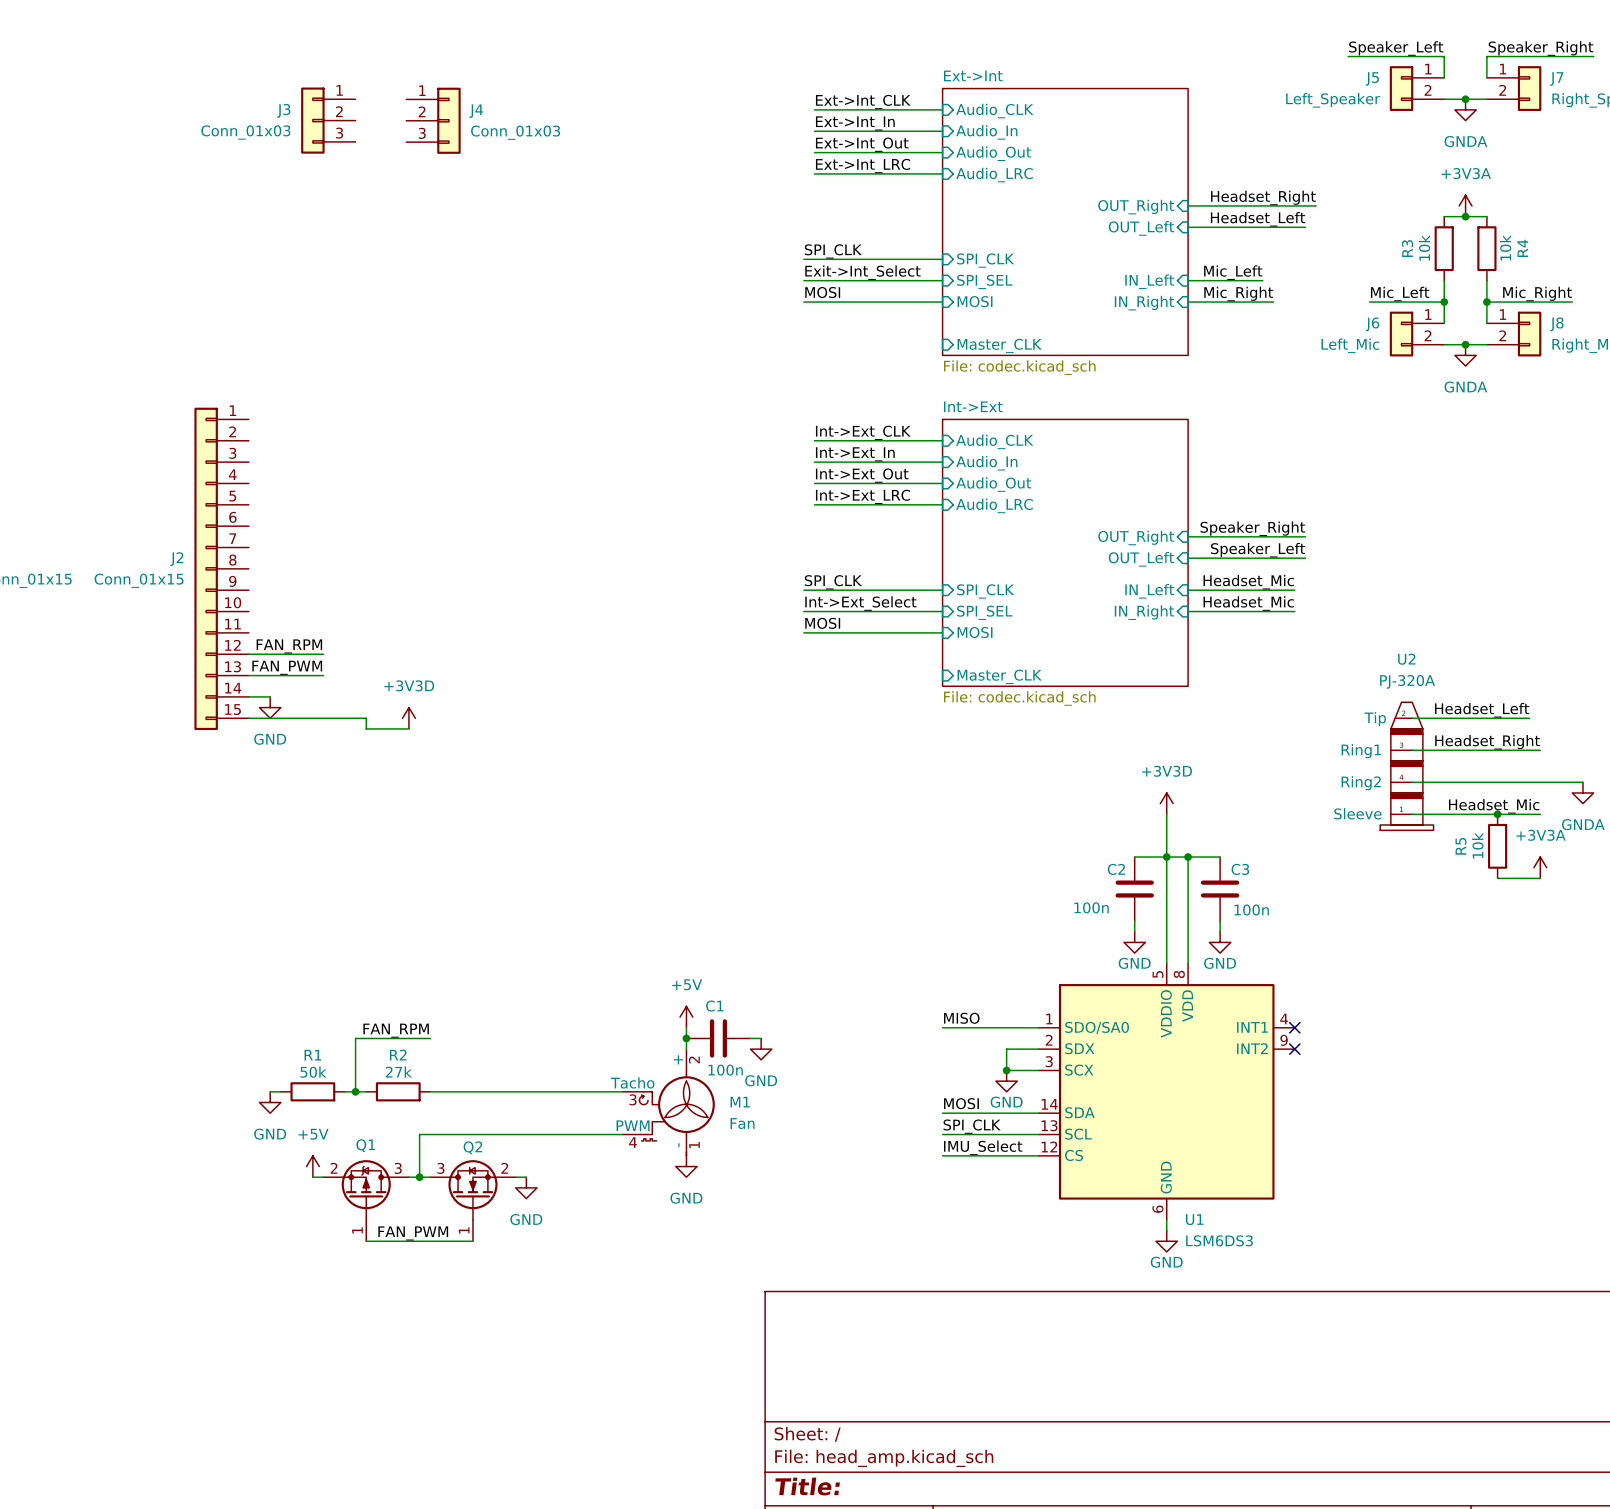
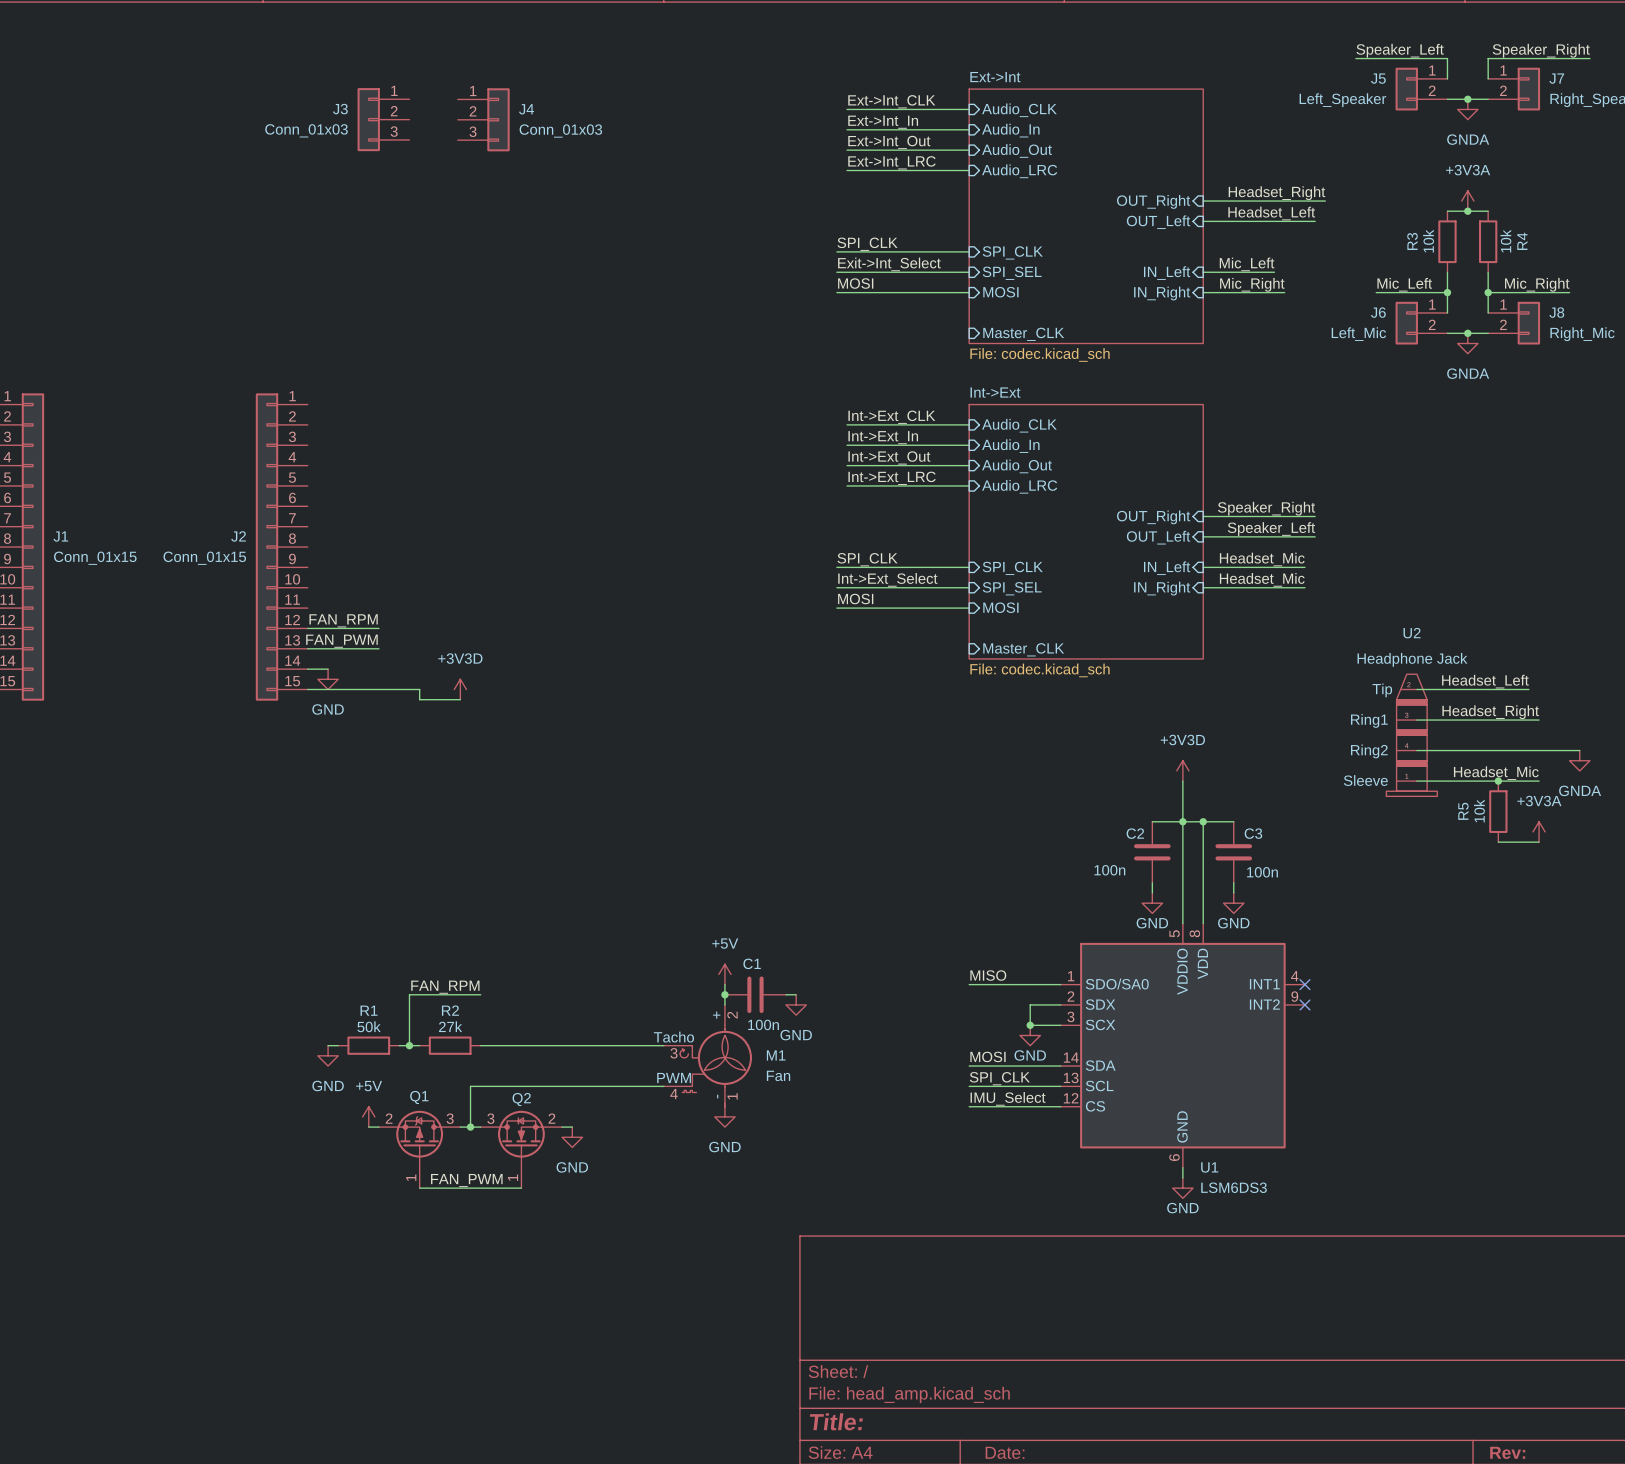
U2 value: PJ-320A (1407, 681) -> Headphone Jack (1412, 659)

